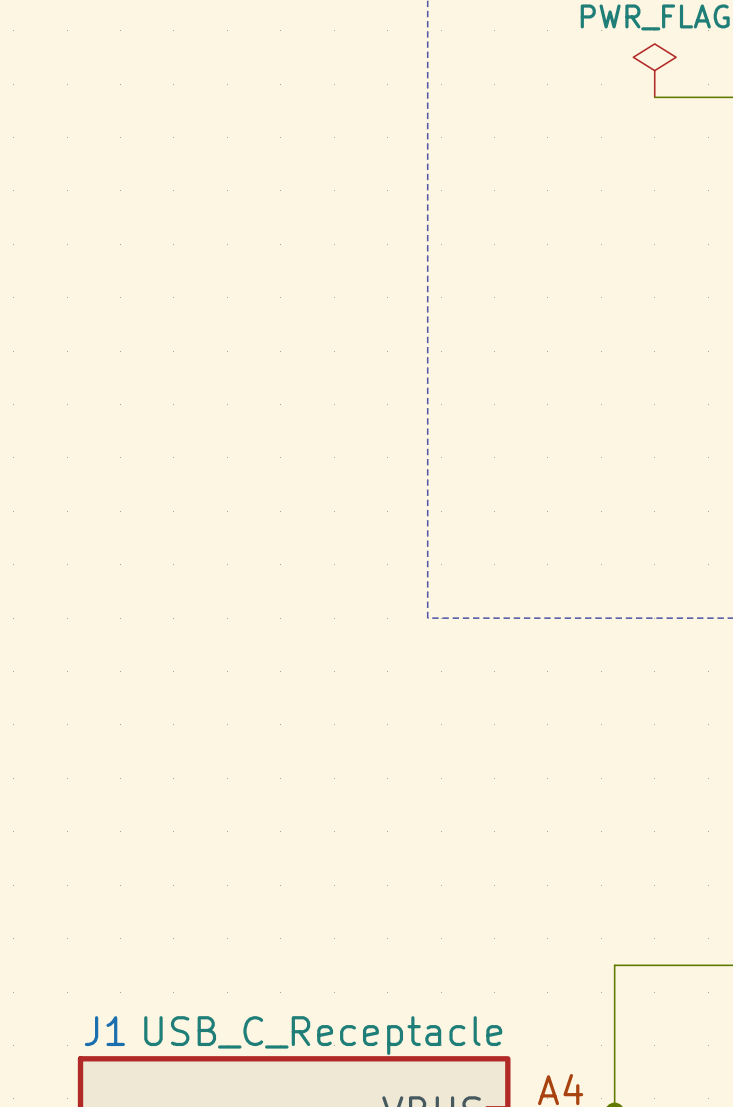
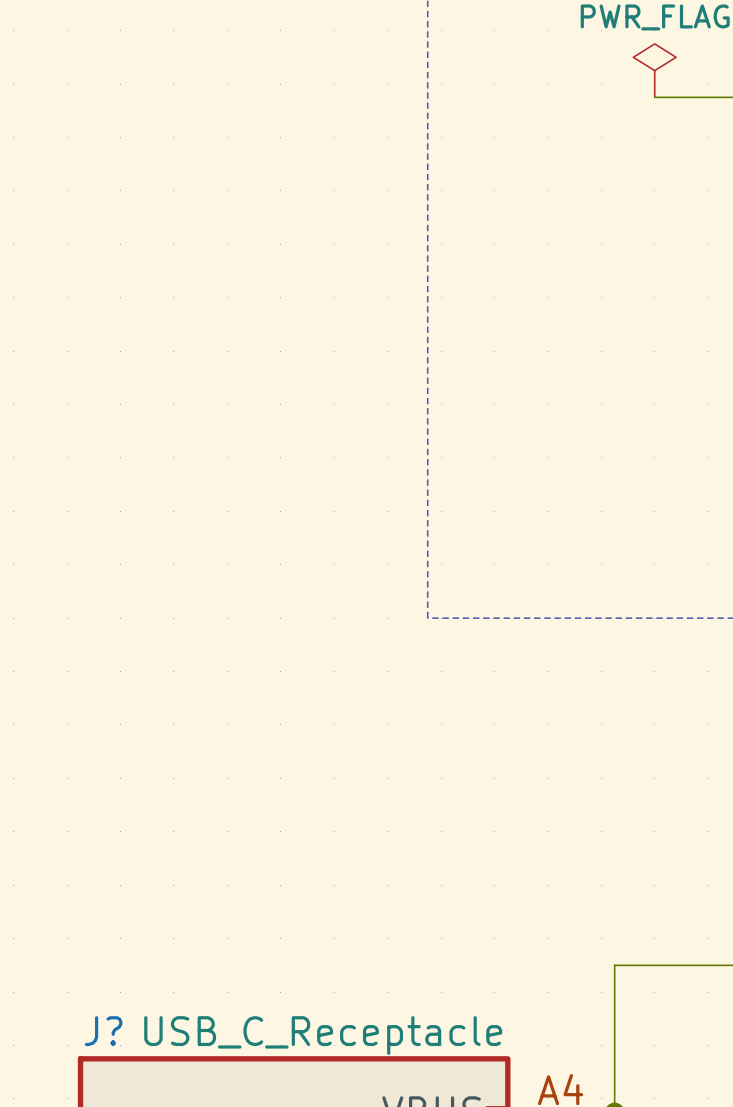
J1 name: J1 (104, 1031) -> J? (103, 1031)

